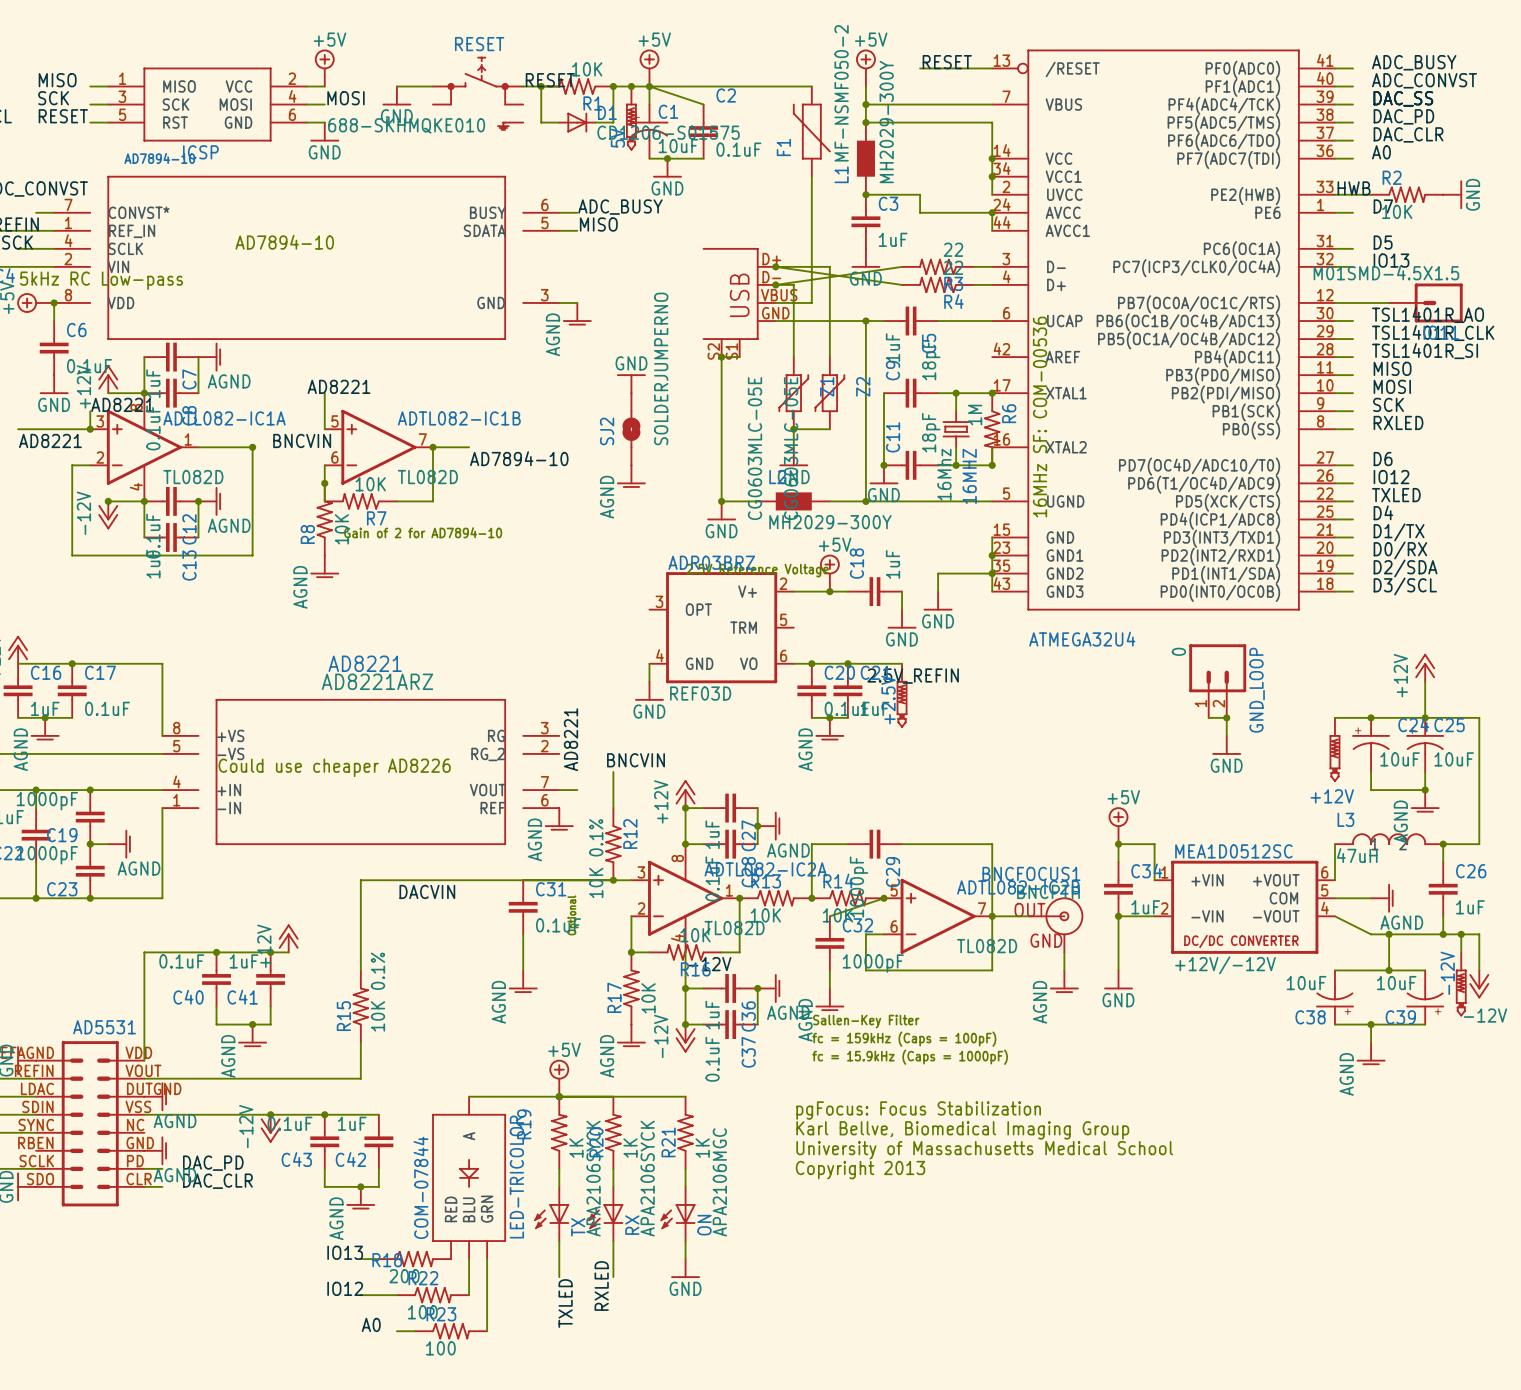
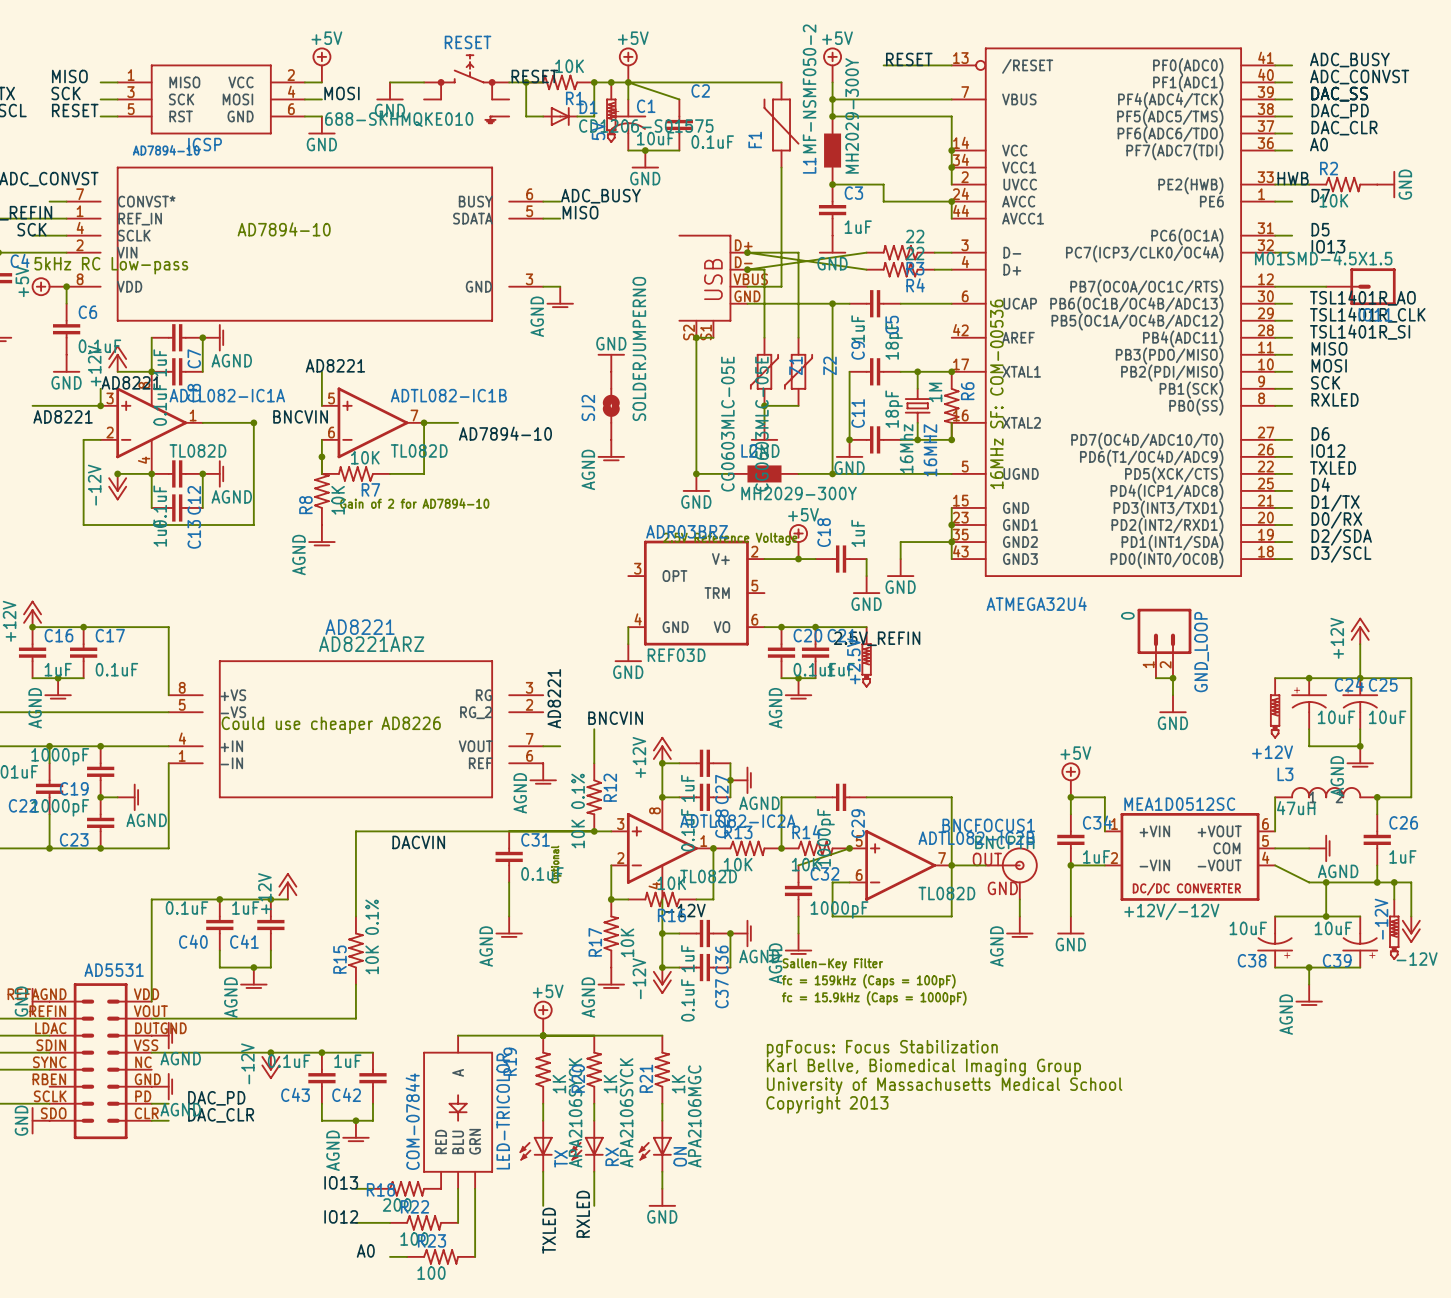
junction: none -> (202, 337)
junction: none -> (32, 627)

